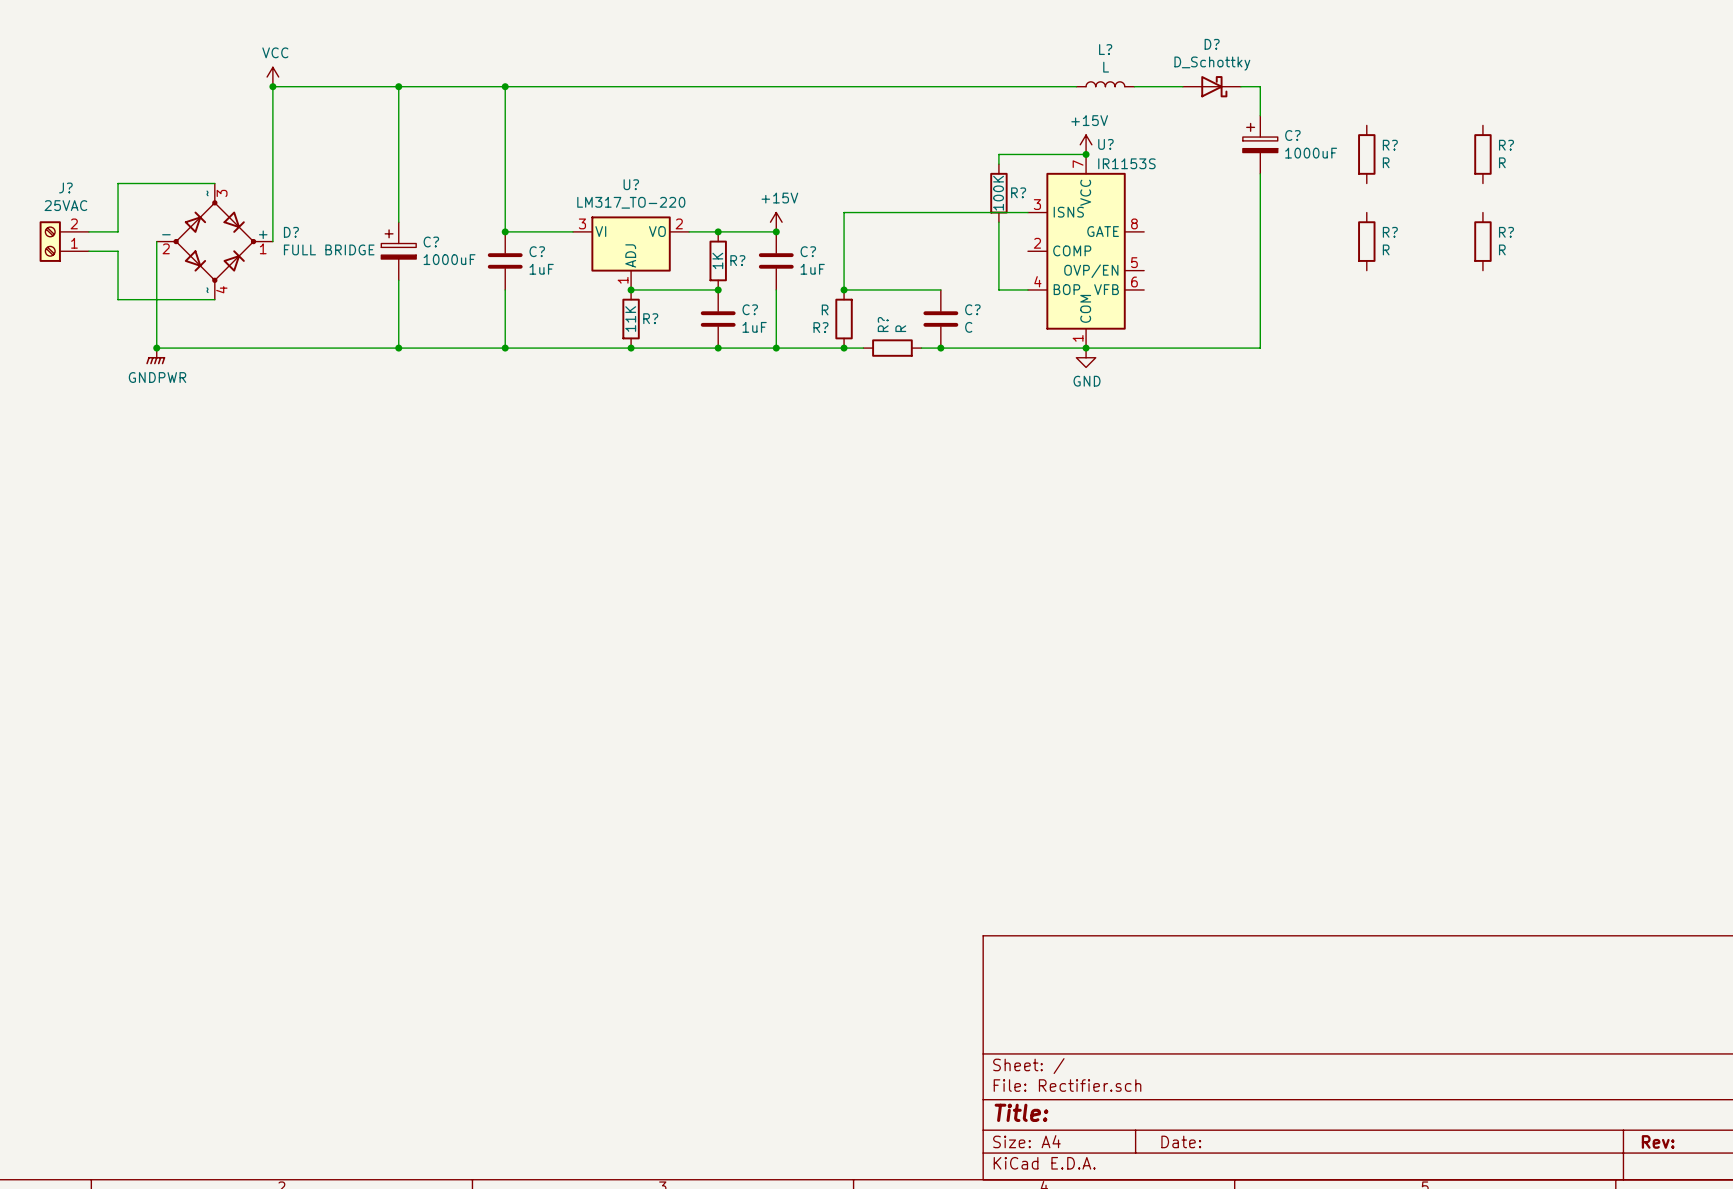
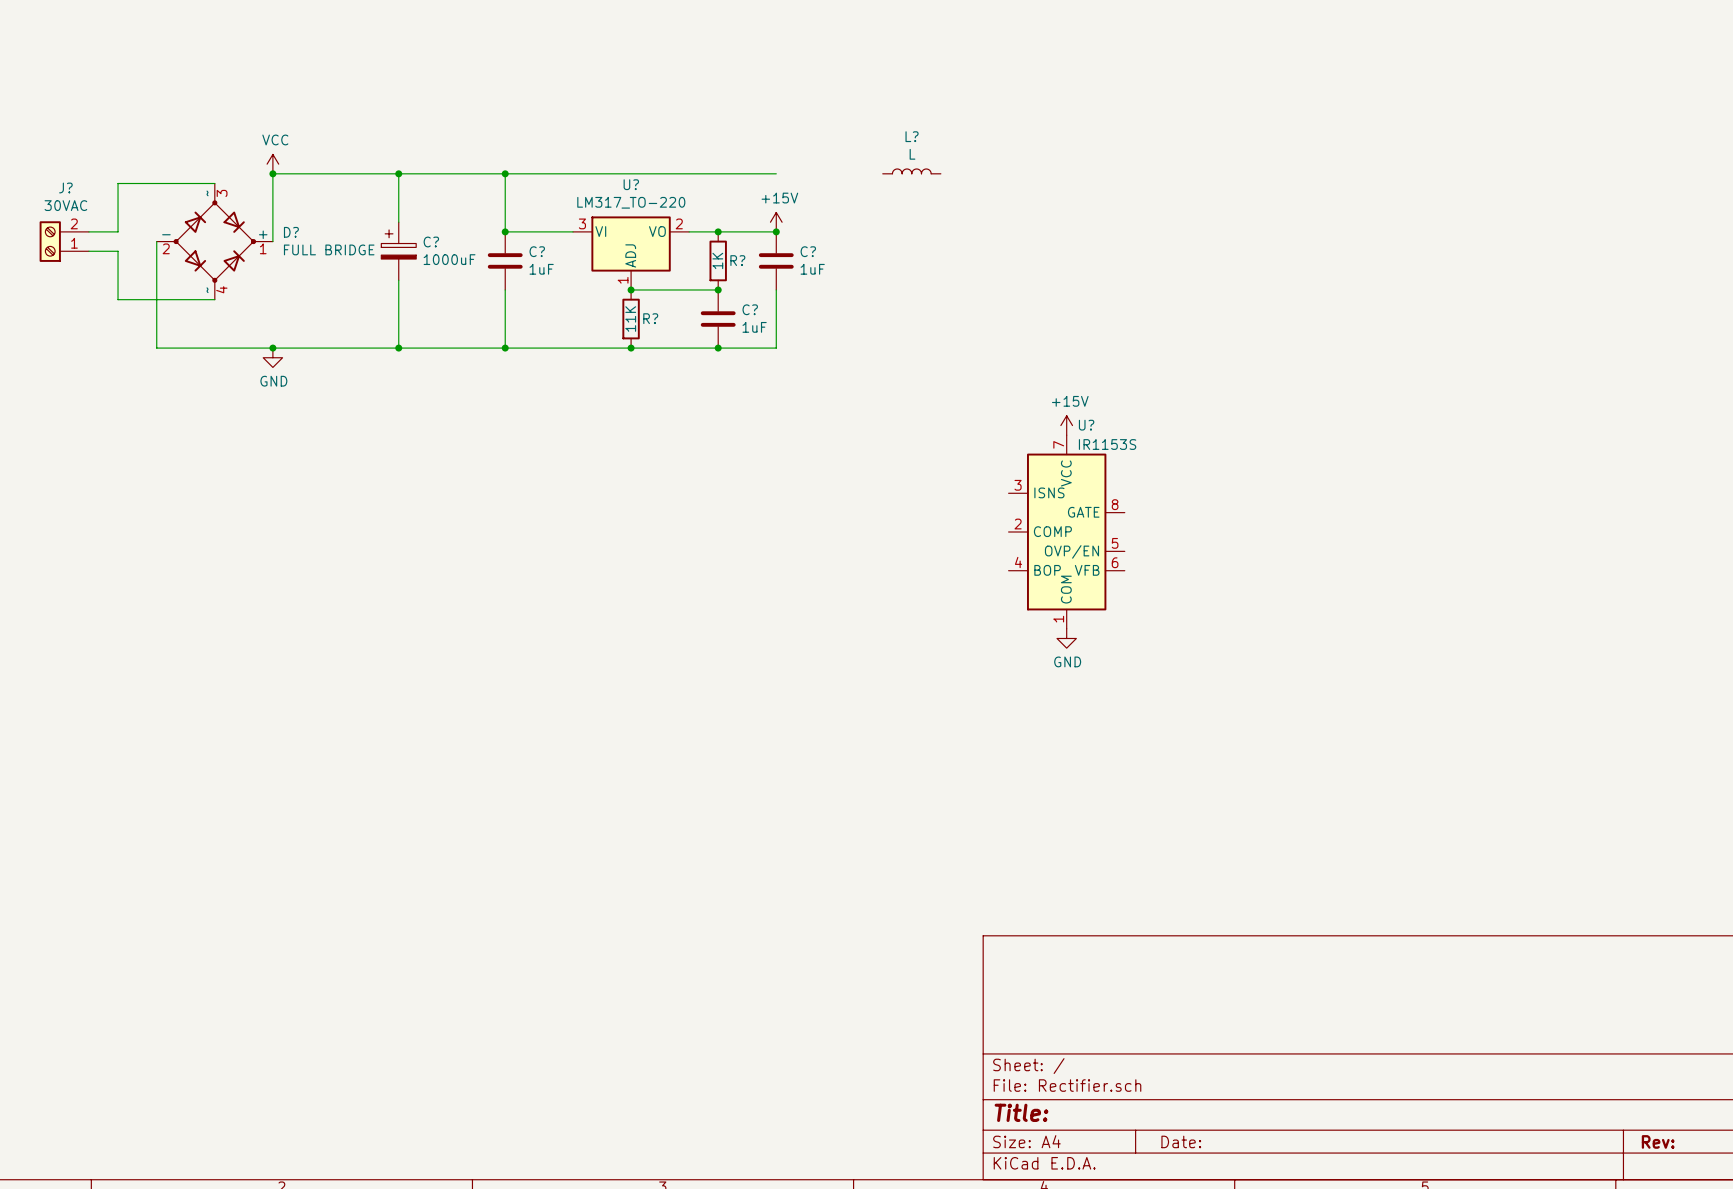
power symbol position: VCC (272, 77) -> VCC (272, 164)
L?: L (1105, 84) -> none
junction: (272, 86) -> none
wire: (398, 86) (398, 173) -> none
junction: (398, 86) -> none
wire: (505, 86) (505, 173) -> none
junction: (505, 86) -> none
wire: (1076, 86) (272, 86) (272, 173) -> (776, 173) (272, 173)
wire: (1134, 86) (1182, 86) -> none
D?: D_Schottky (1211, 86) -> none
wire: (1240, 86) (1260, 86) (1260, 115) -> none
power symbol: +15V (1086, 144) -> none
C?: 1000uF (1260, 144) -> none
wire: (1086, 154) (998, 154) (998, 164) -> none
junction: (1086, 154) -> none
R?: R (1366, 154) -> none
R?: R (1482, 154) -> none
L?: none -> L (911, 171)
junction: none -> (272, 173)
junction: none -> (398, 173)
junction: none -> (505, 173)
wire: (1260, 173) (1260, 348) (921, 348) -> none
R?: 100K (998, 193) -> none
J? value: 25VAC (65, 205) -> 30VAC (65, 205)
wire: (1027, 212) (844, 212) (844, 289) (940, 289) -> none
wire: (998, 222) (998, 289) (1027, 289) -> none
R?: R (1366, 241) -> none
R?: R (1482, 241) -> none
U?: IR1153S (1086, 251) -> none
junction: (844, 289) -> none
R?: R (844, 319) -> none
C?: C (940, 319) -> none
junction: (156, 348) -> none
junction: none -> (272, 348)
wire: (776, 348) (863, 348) -> none
junction: (776, 348) -> none
junction: (844, 348) -> none
R?: R (892, 348) -> none
junction: (940, 348) -> none
junction: (1086, 348) -> none
power symbol: GNDPWR (155, 356) -> none
power symbol: none -> GND (272, 357)
power symbol: GND (1086, 357) -> none
power symbol: none -> +15V (1066, 425)
U?: none -> IR1153S (1066, 532)
power symbol: none -> GND (1066, 638)

